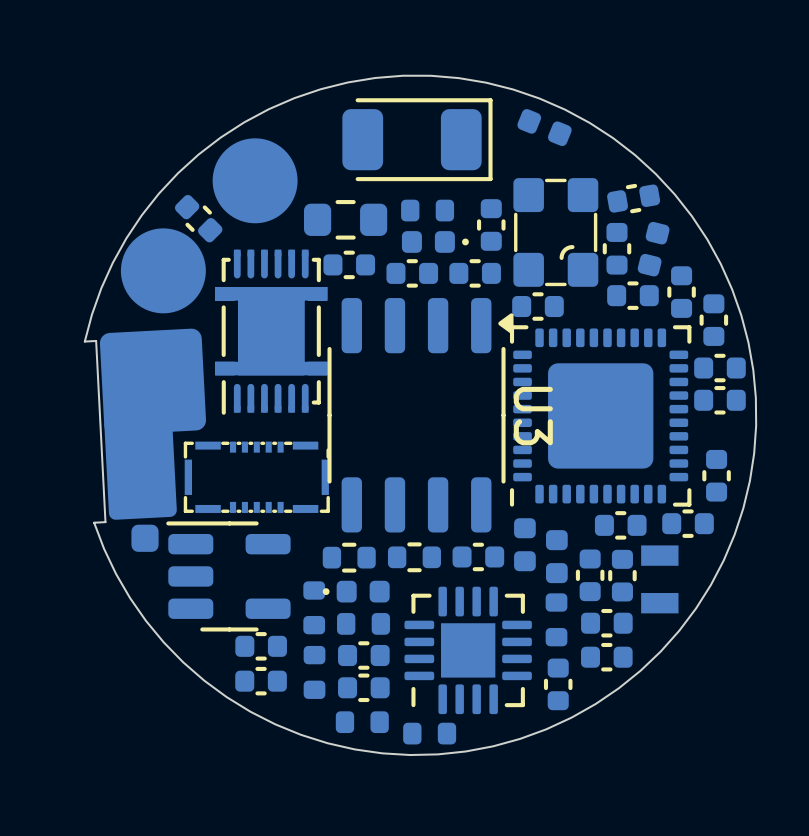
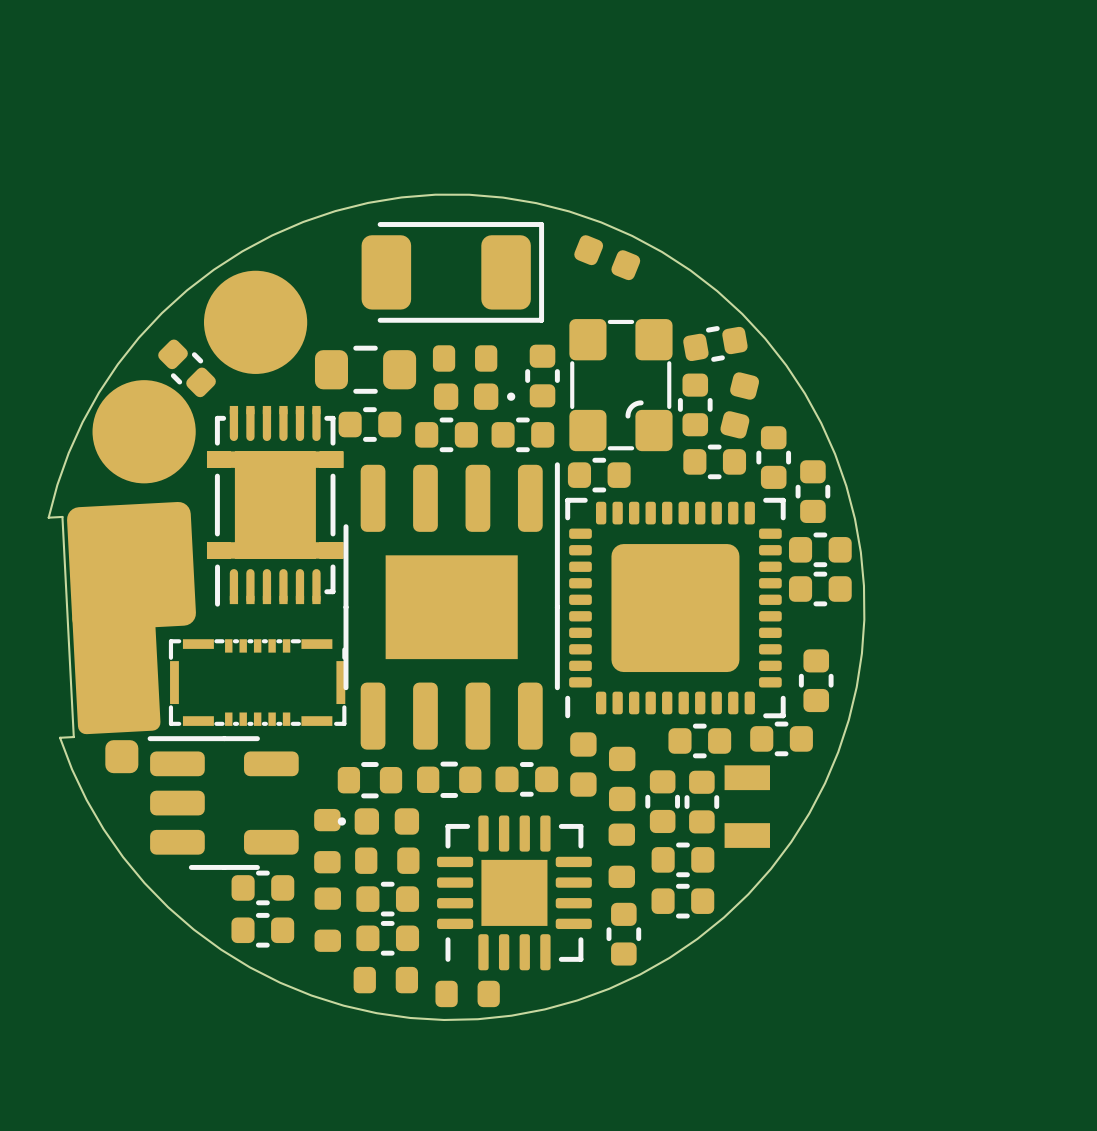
part: none -> (451, 605)
U3: (420, 415) -> none

